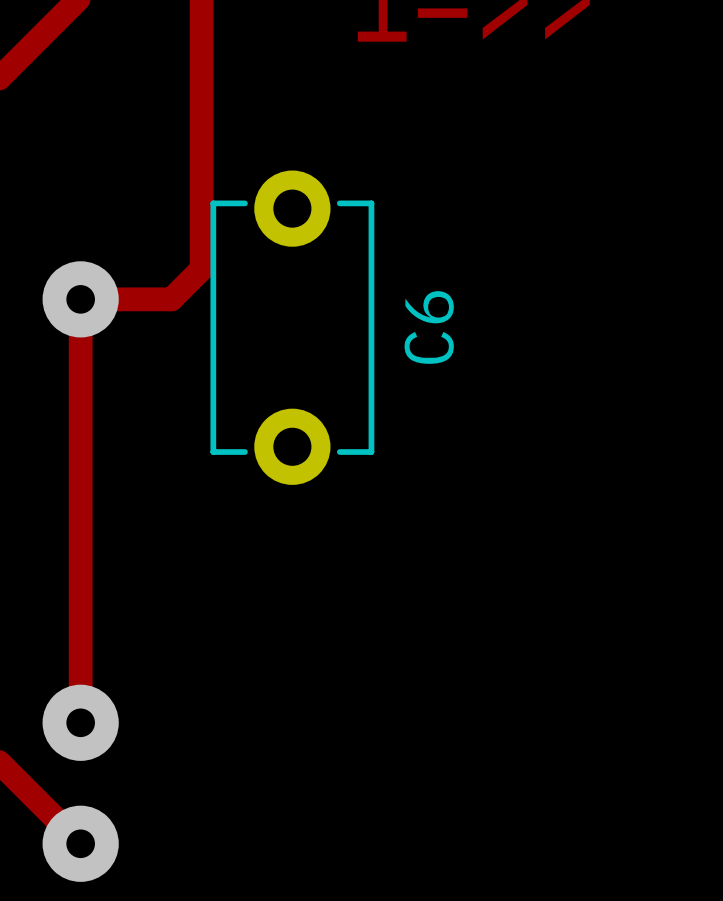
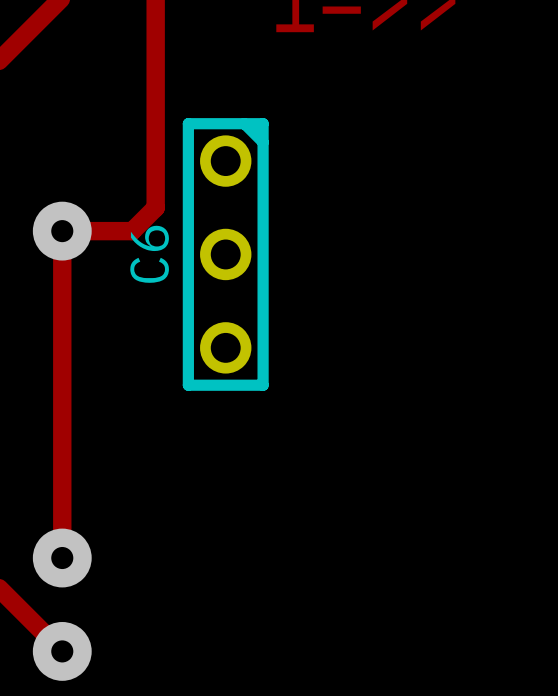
C6 footprint: [210, 170, 375, 485] -> [182, 118, 269, 391]
C6 name position: C6 (429, 327) -> C6 (149, 254)

